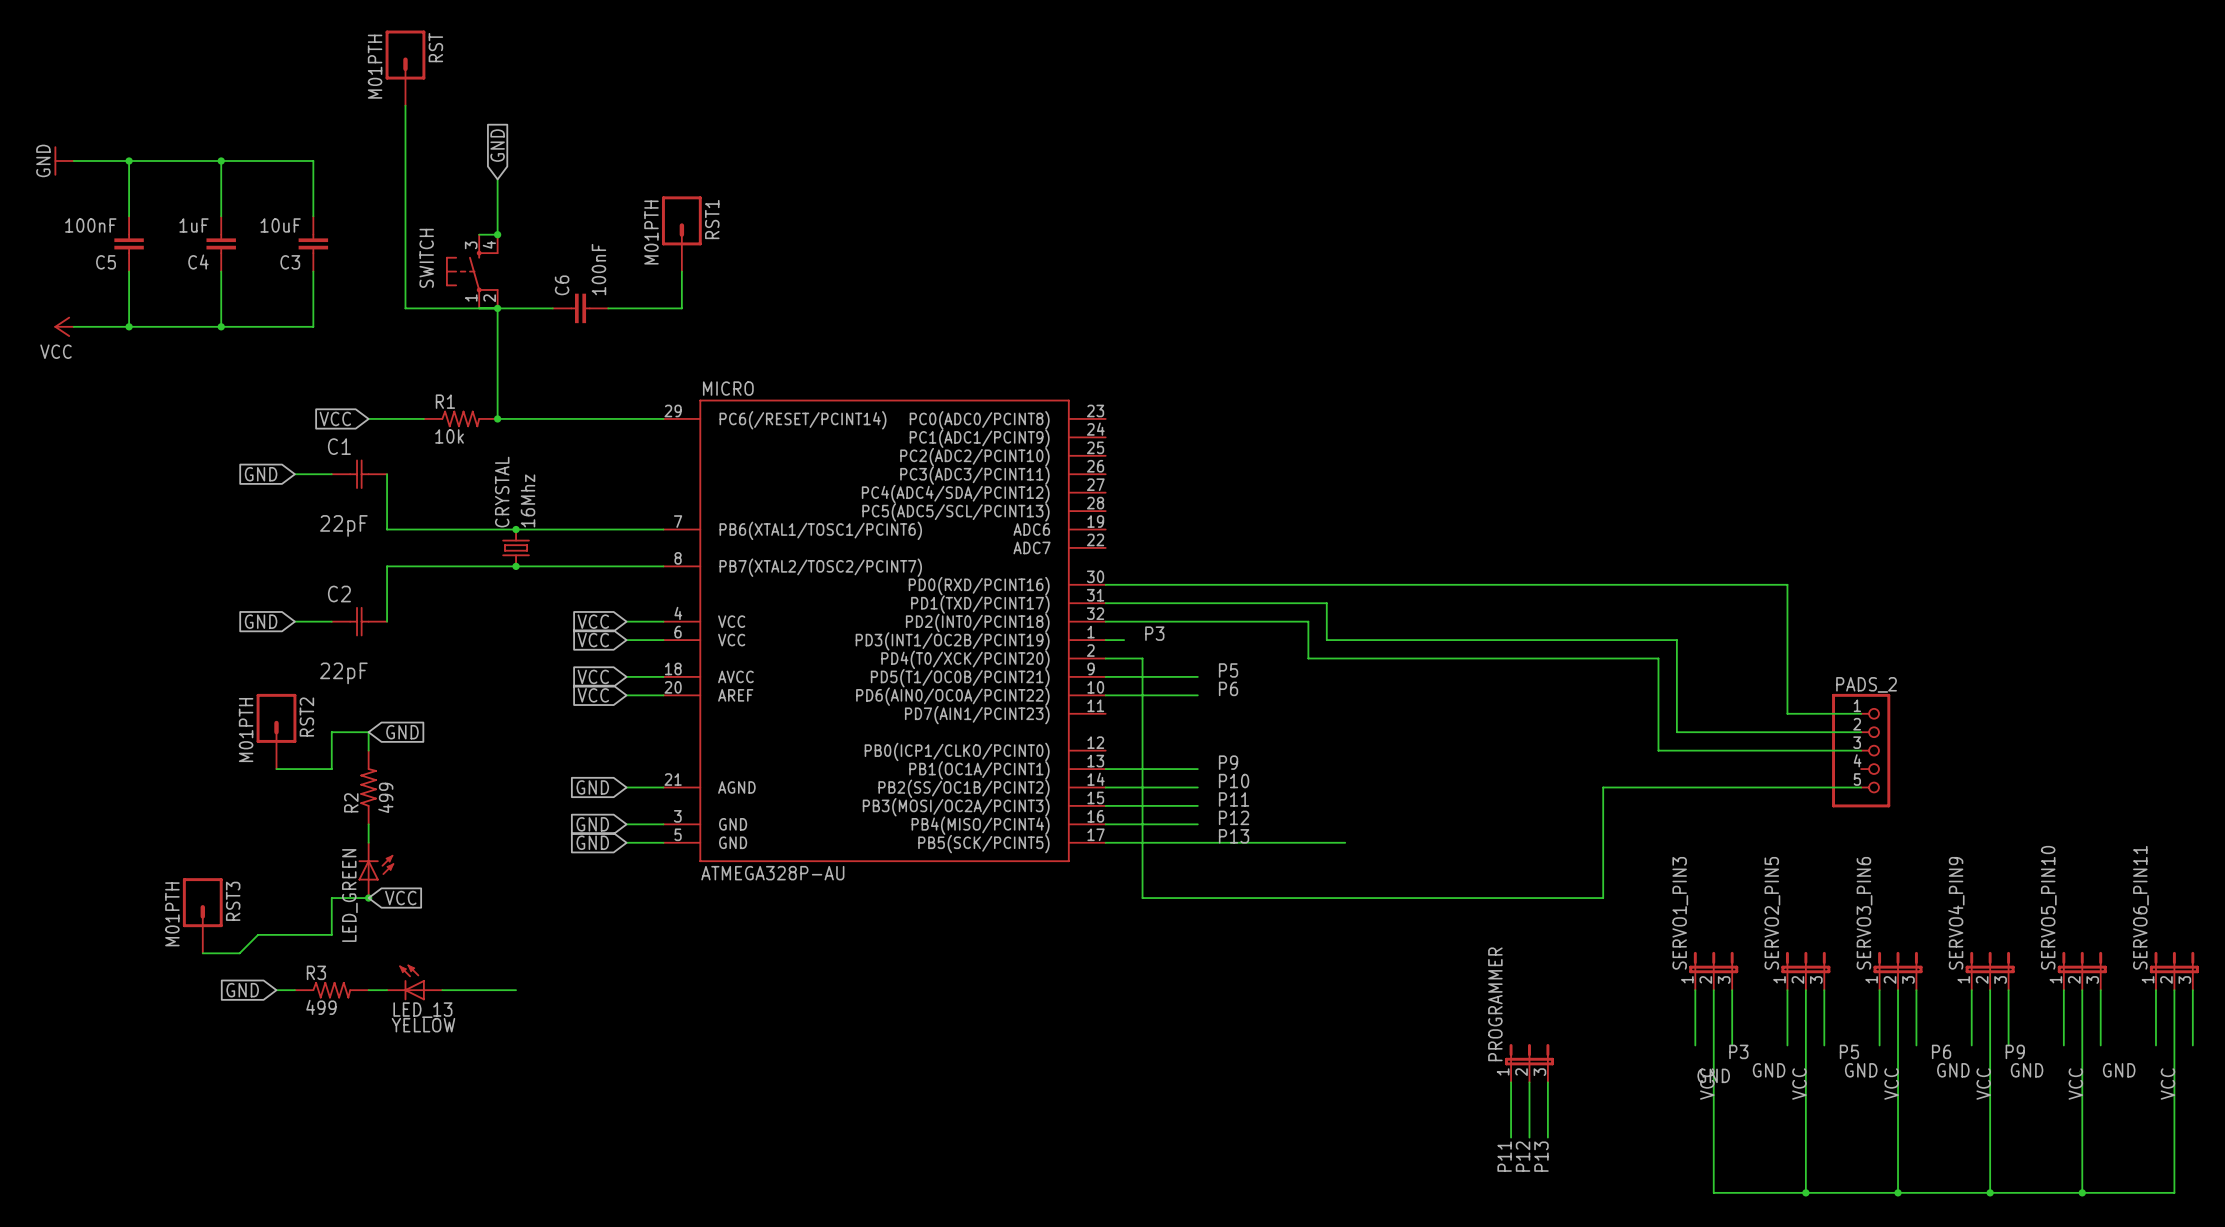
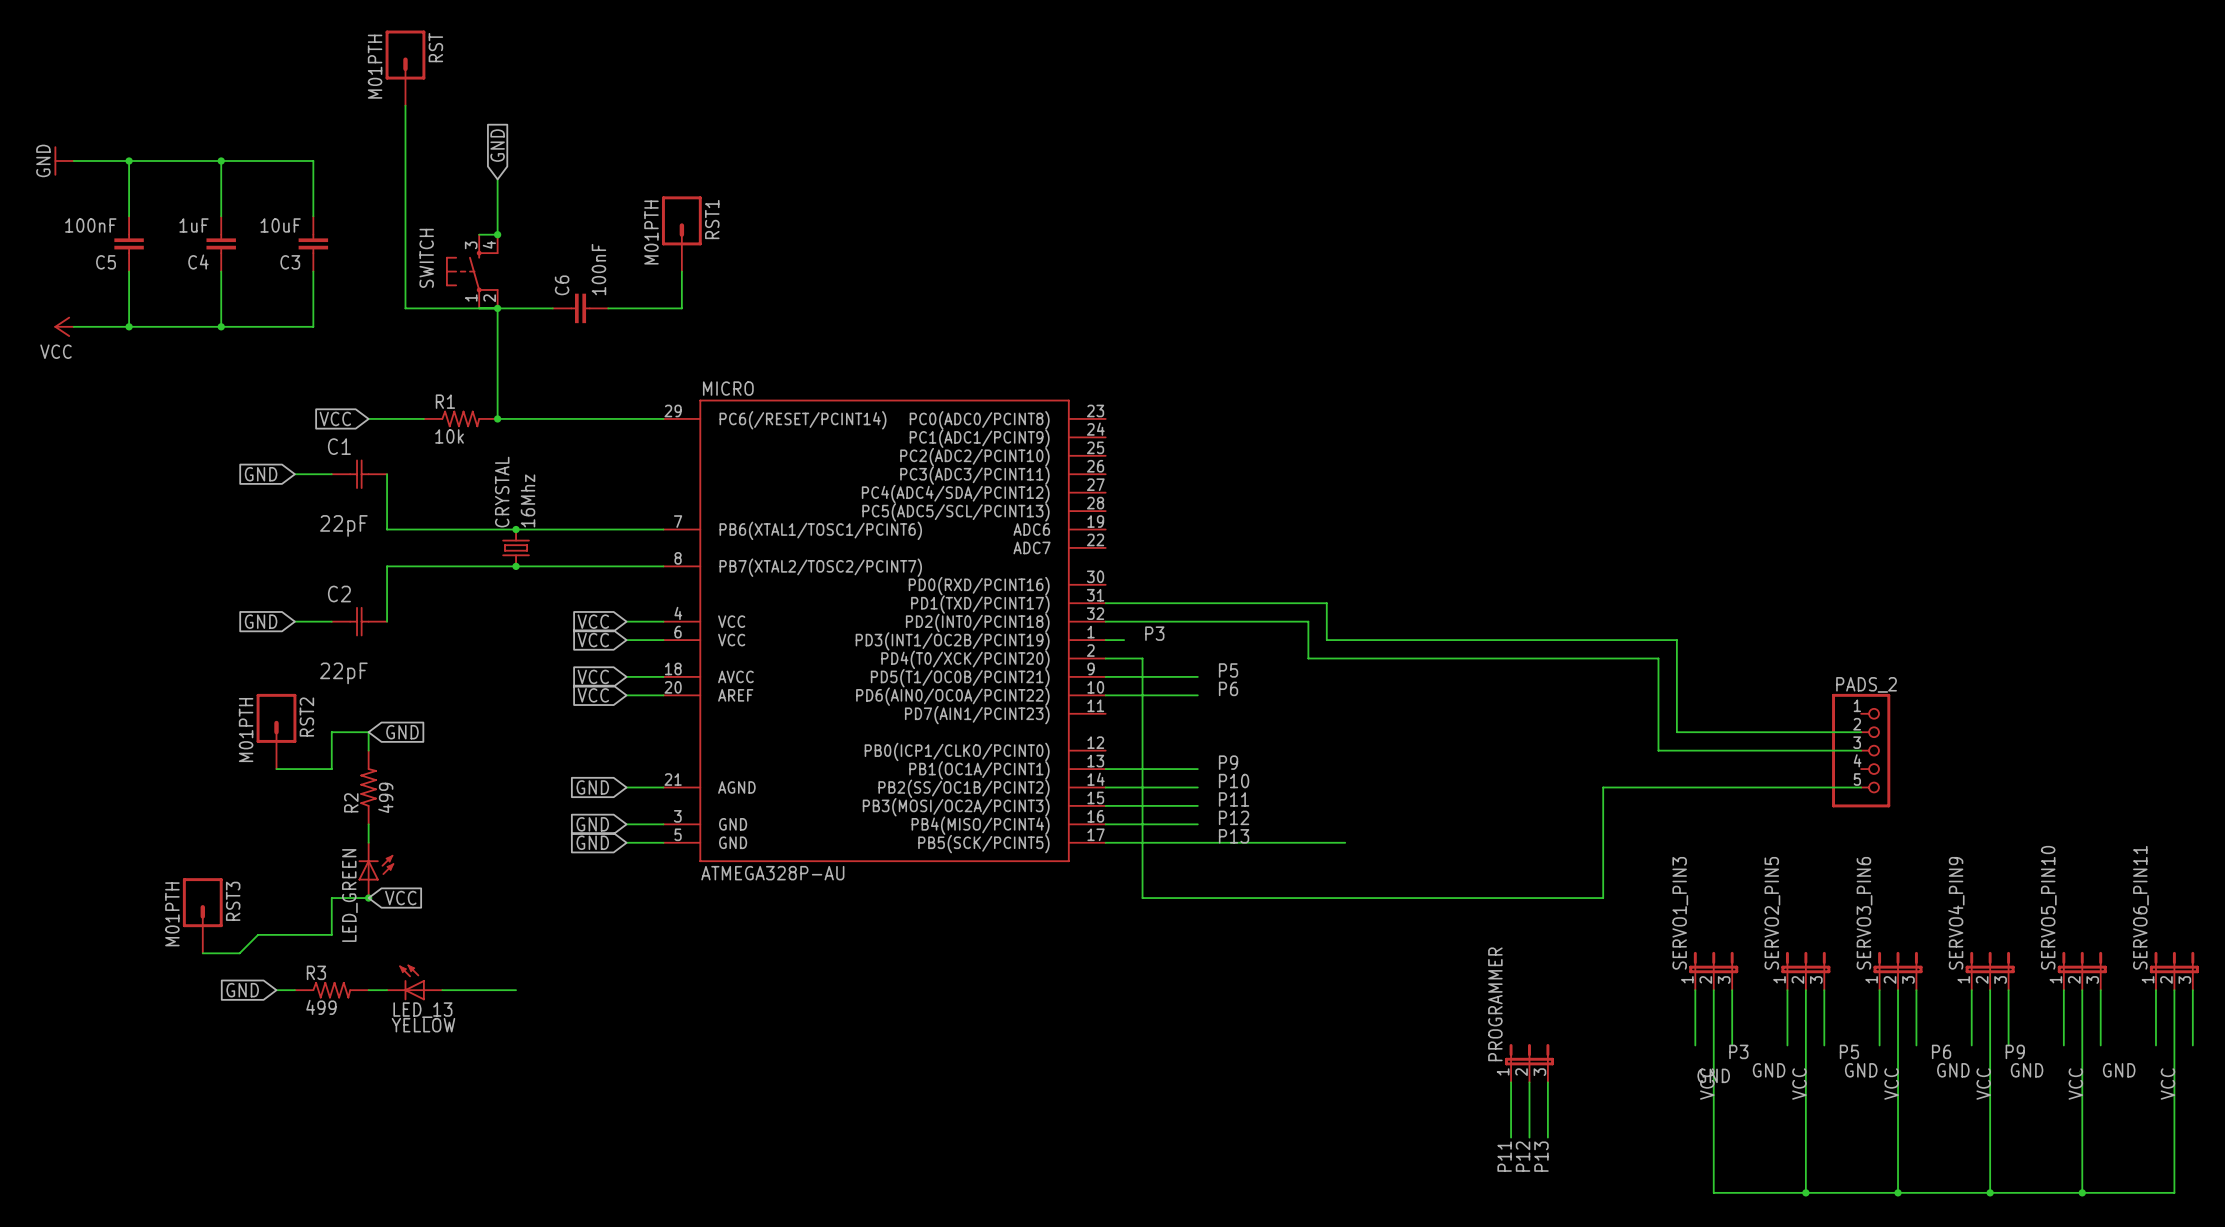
wire: (1105, 584) (1787, 584) (1787, 713) (1861, 713) -> none

